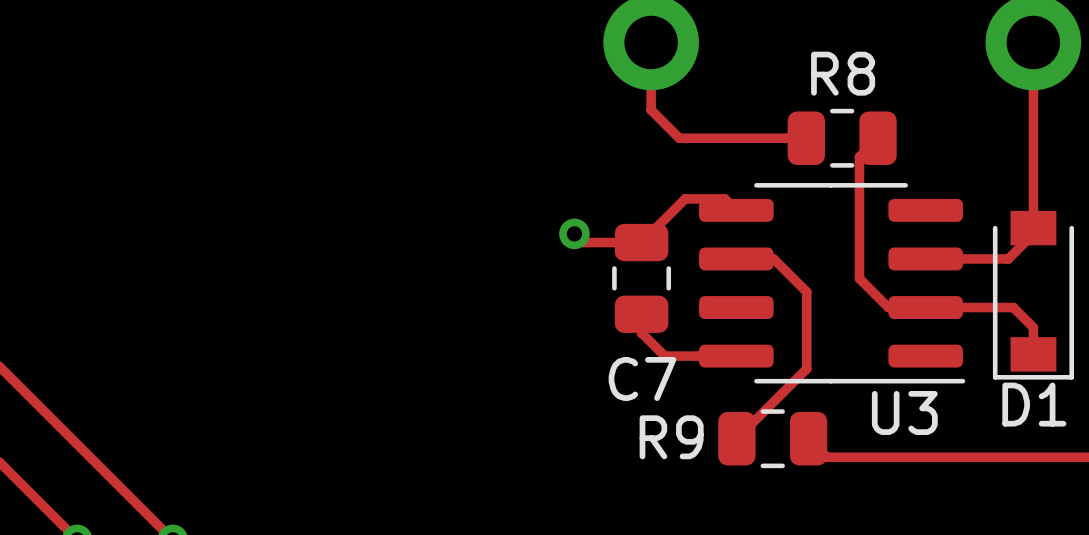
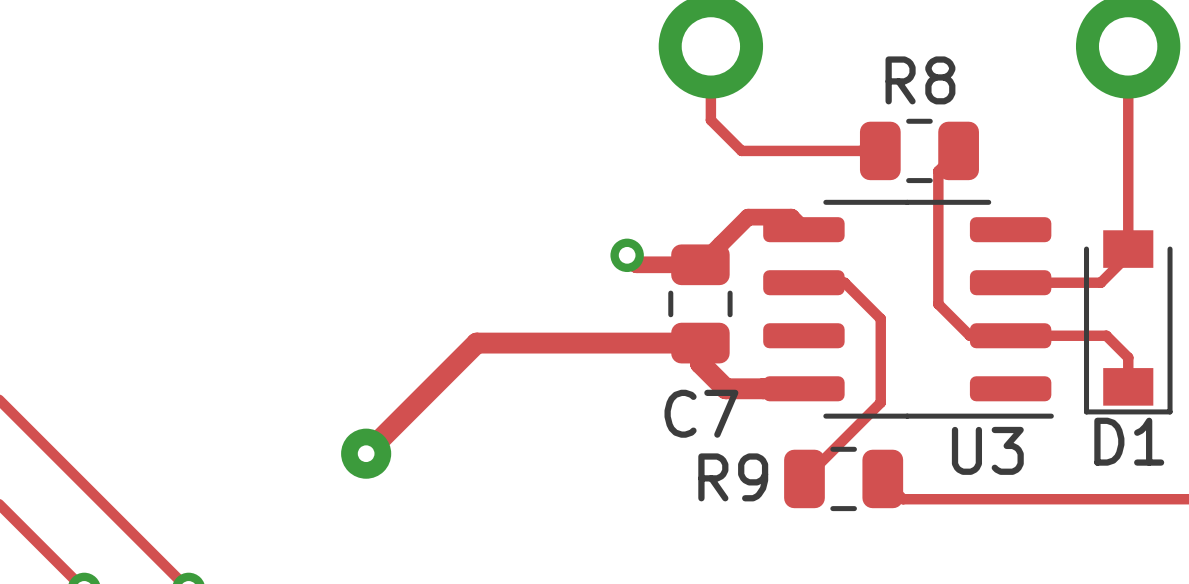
track width: thin (736, 210) (724, 198) (685, 198) (641, 242) (583, 242) (574, 233) -> thick (803, 229) (791, 217) (748, 217) (700, 264) (636, 264) (627, 255)
track: none -> (700, 343) (476, 343) (366, 453)
track width: thin (641, 314) (641, 332) (664, 356) (736, 356) -> thick (700, 343) (700, 363) (725, 388) (803, 388)
via: none -> (366, 453)

